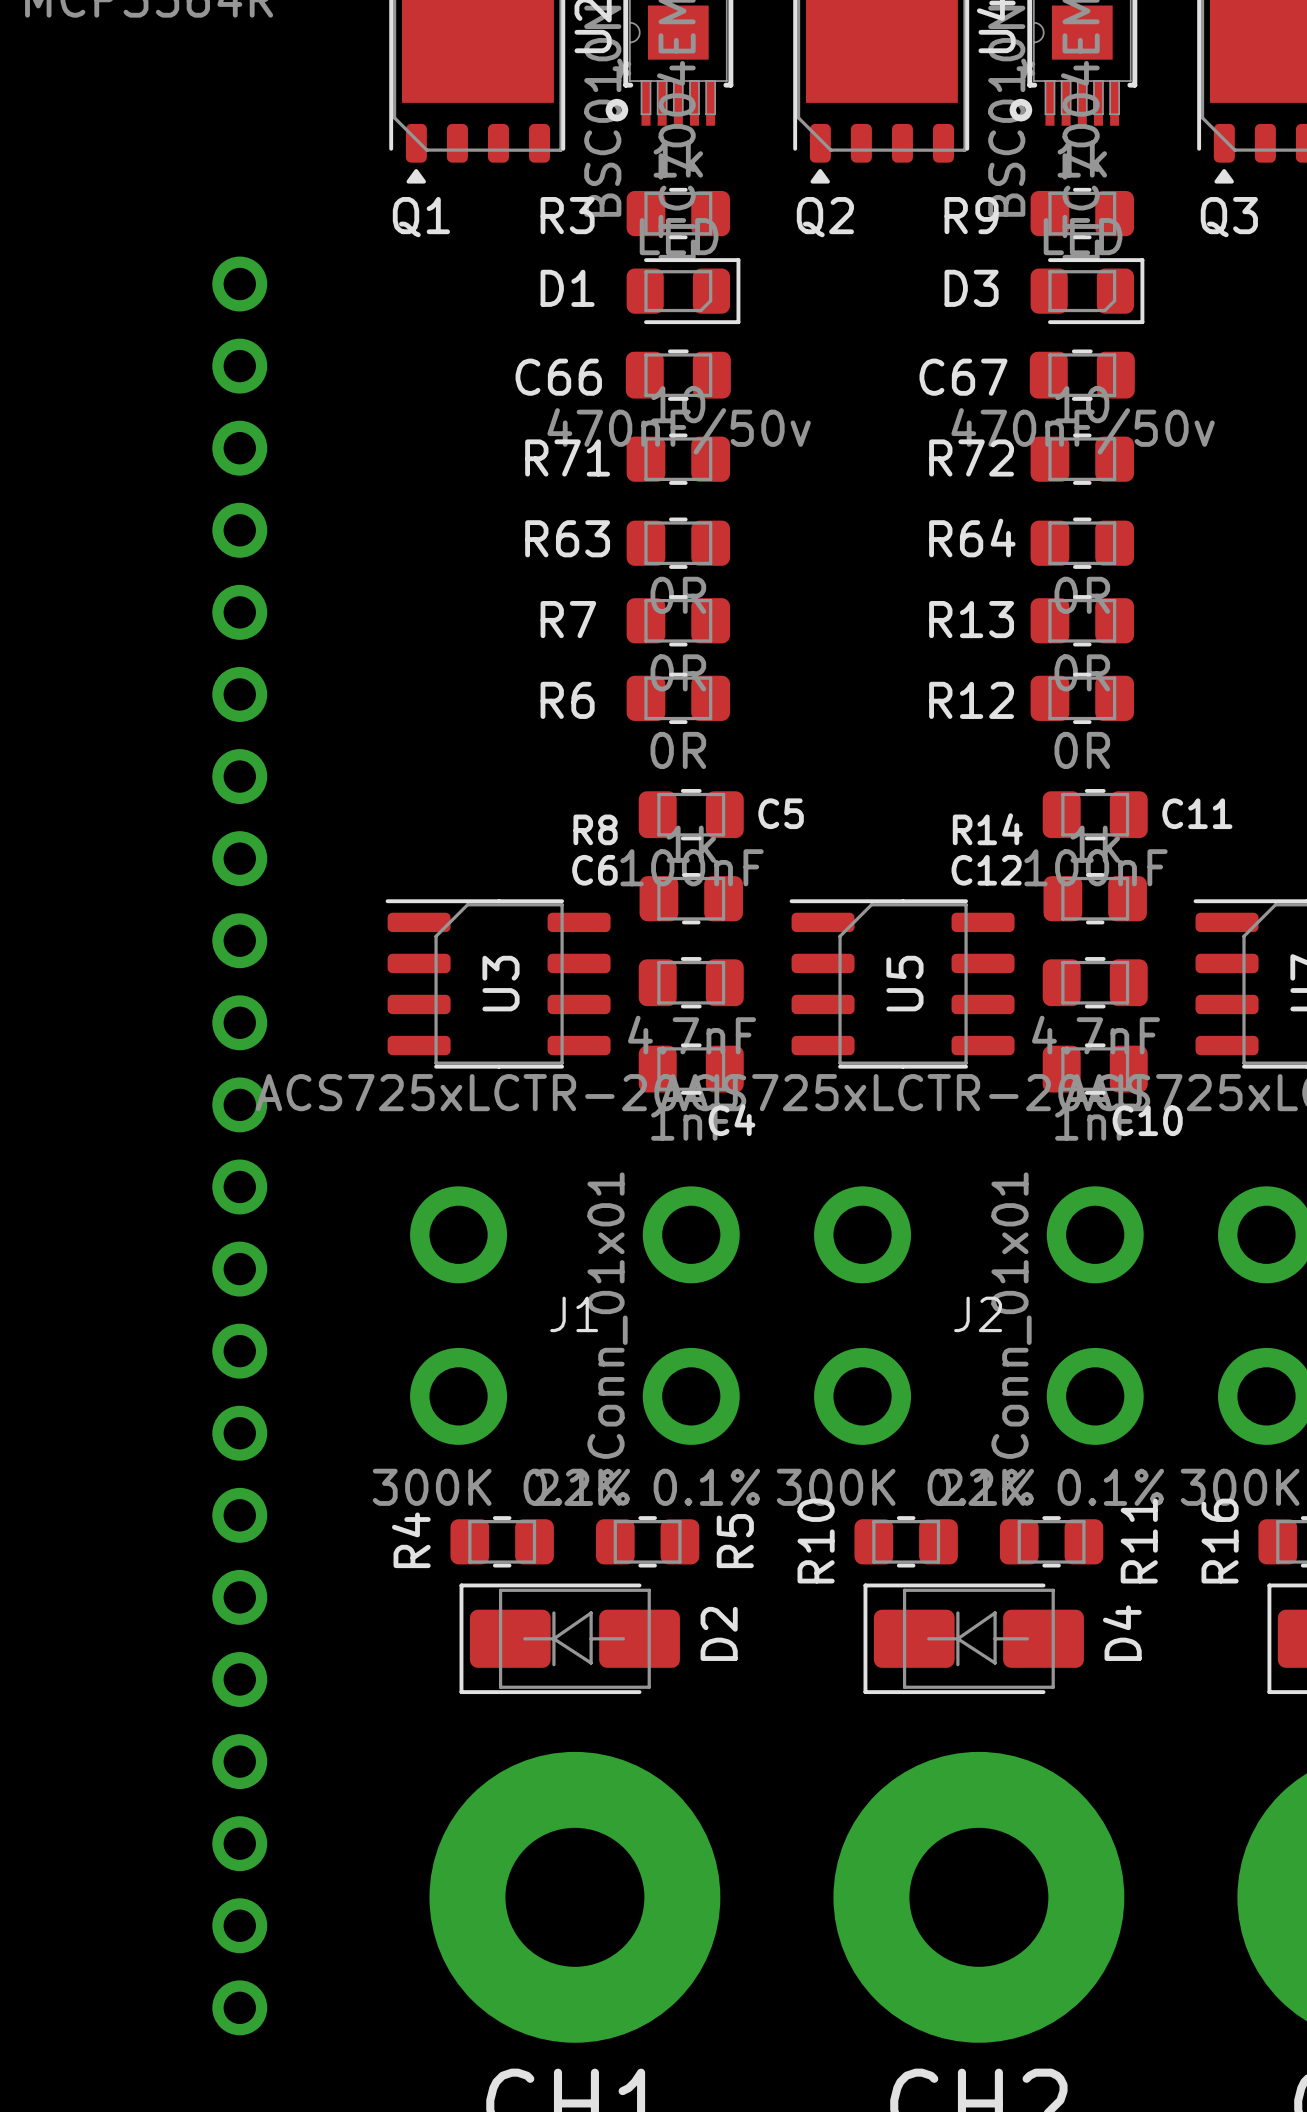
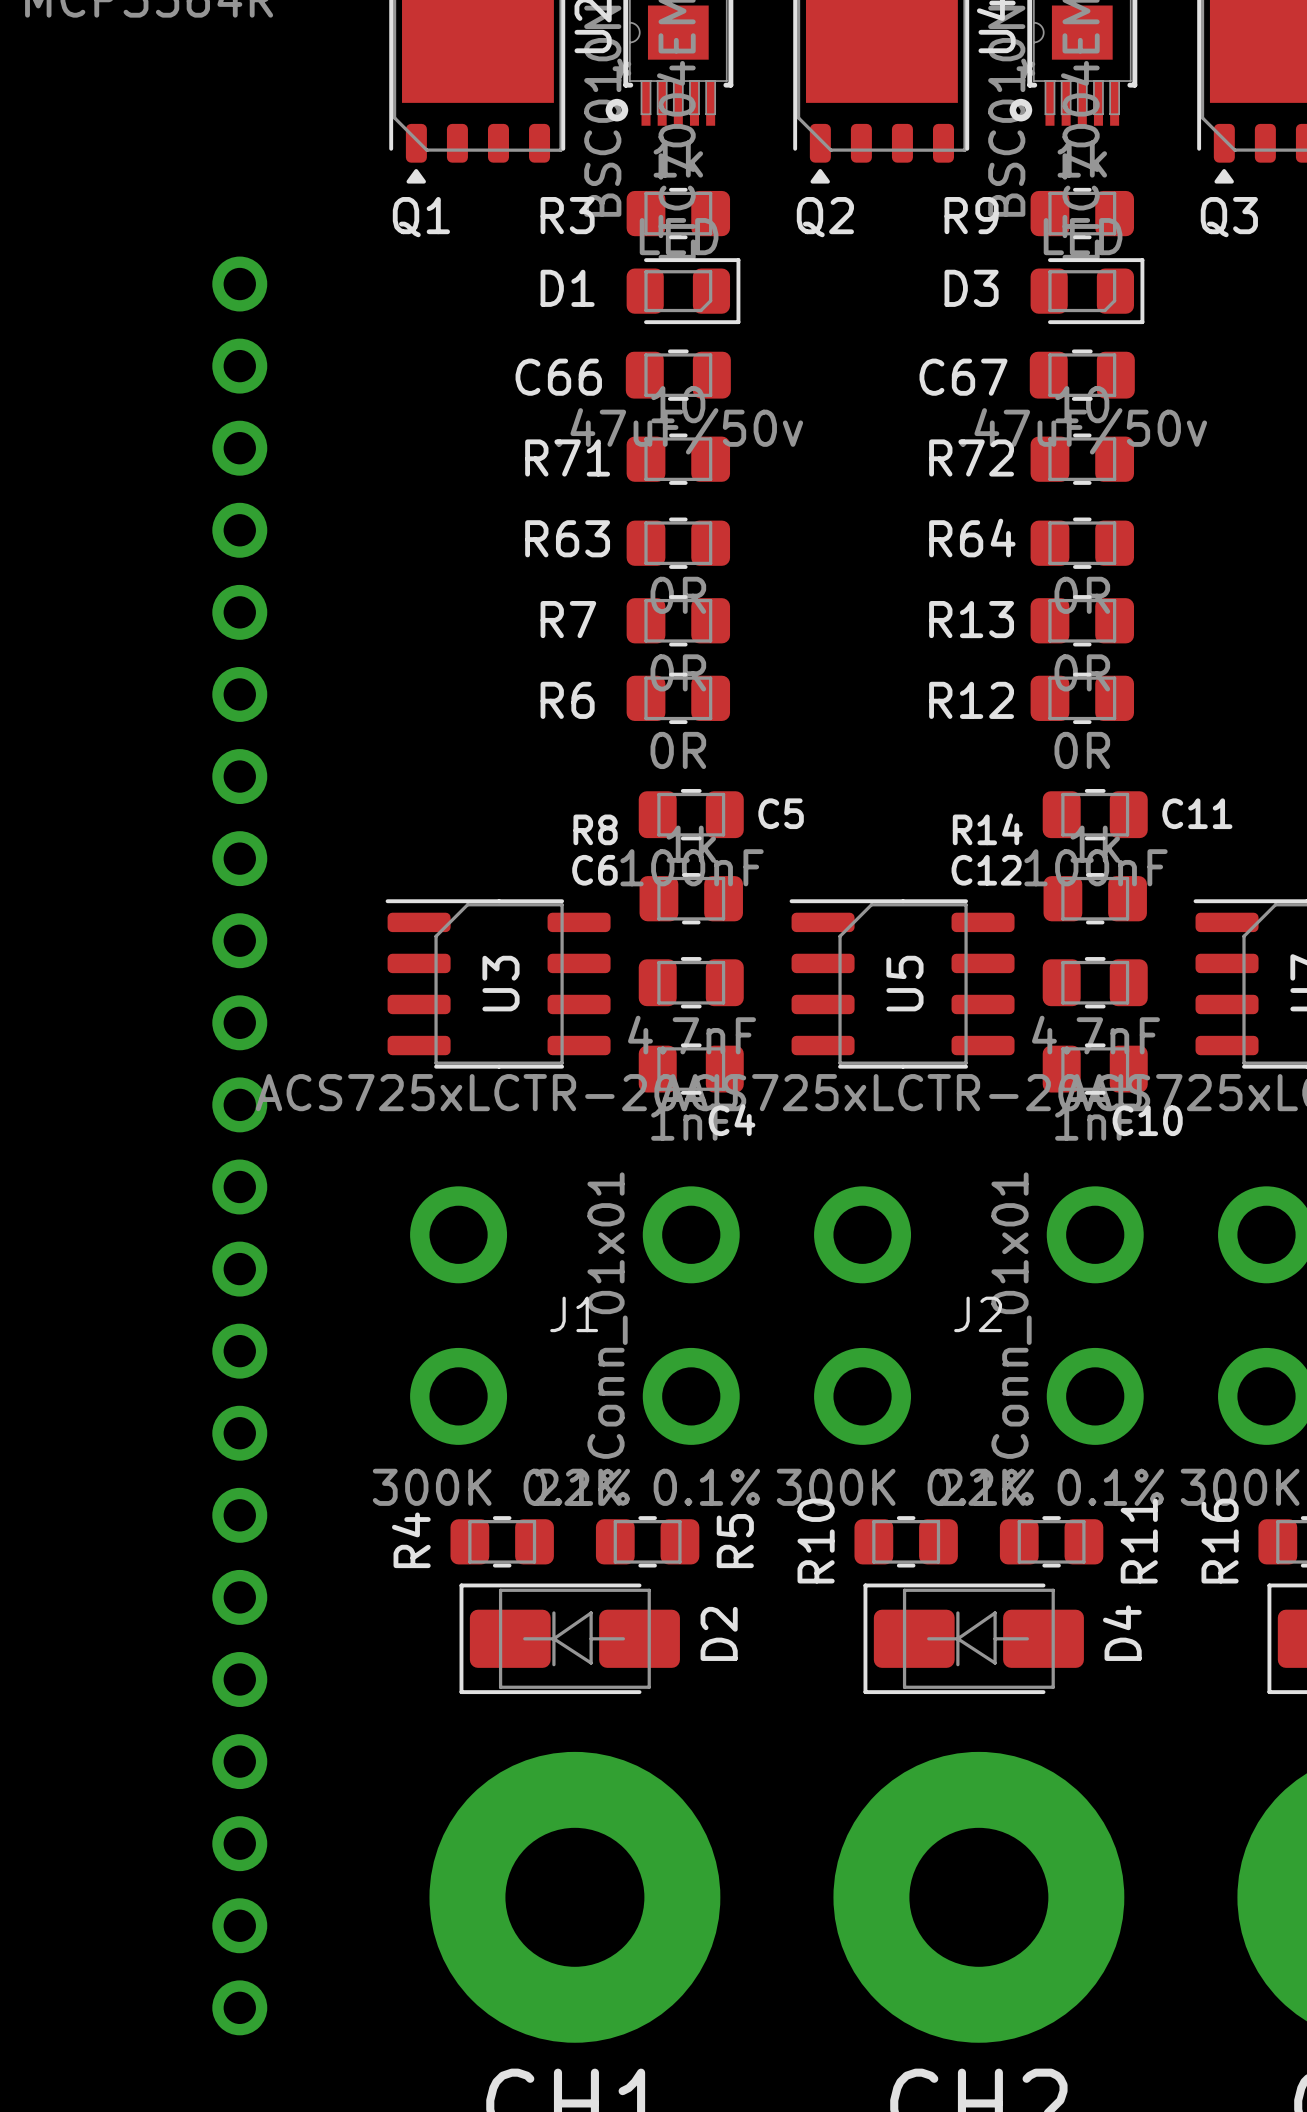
C66 value: 470nF/50v (679, 431) -> .47uF/50v (679, 431)
C67 value: 470nF/50v (1083, 431) -> .47uF/50v (1083, 431)

